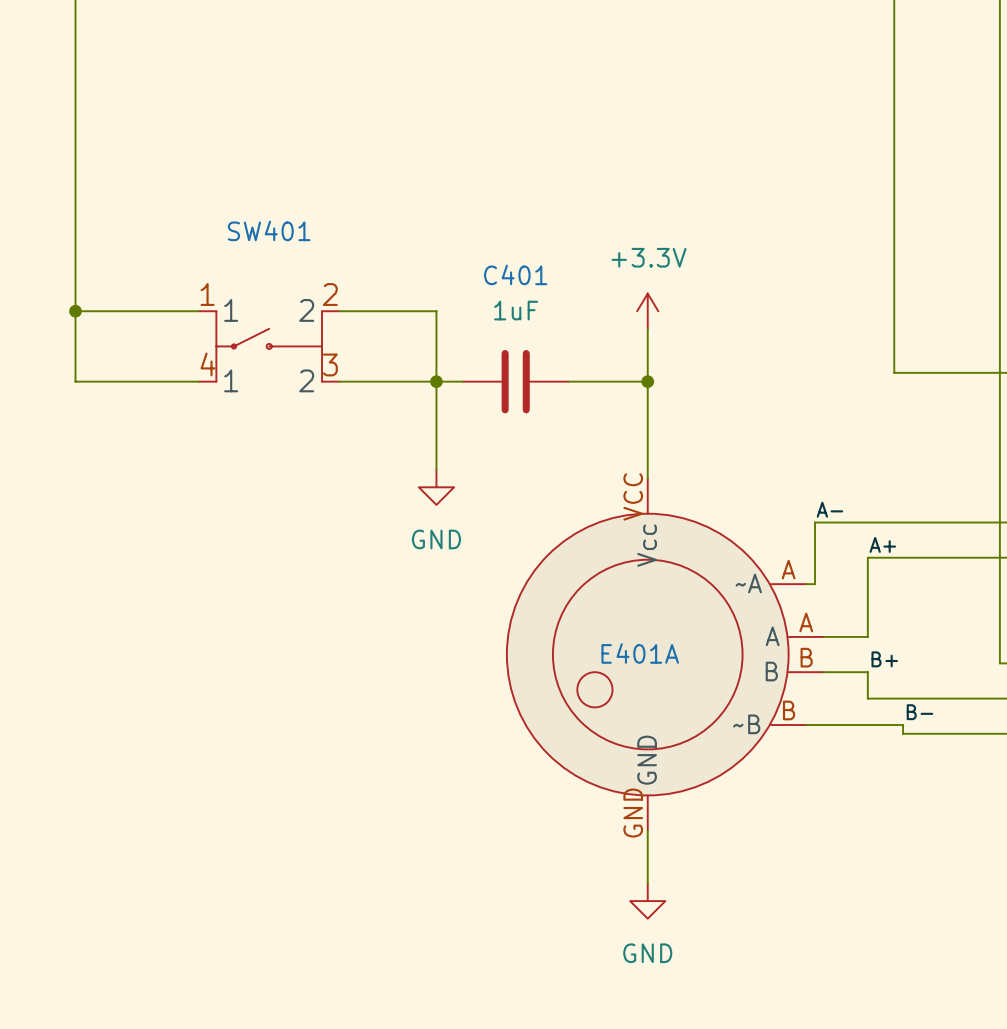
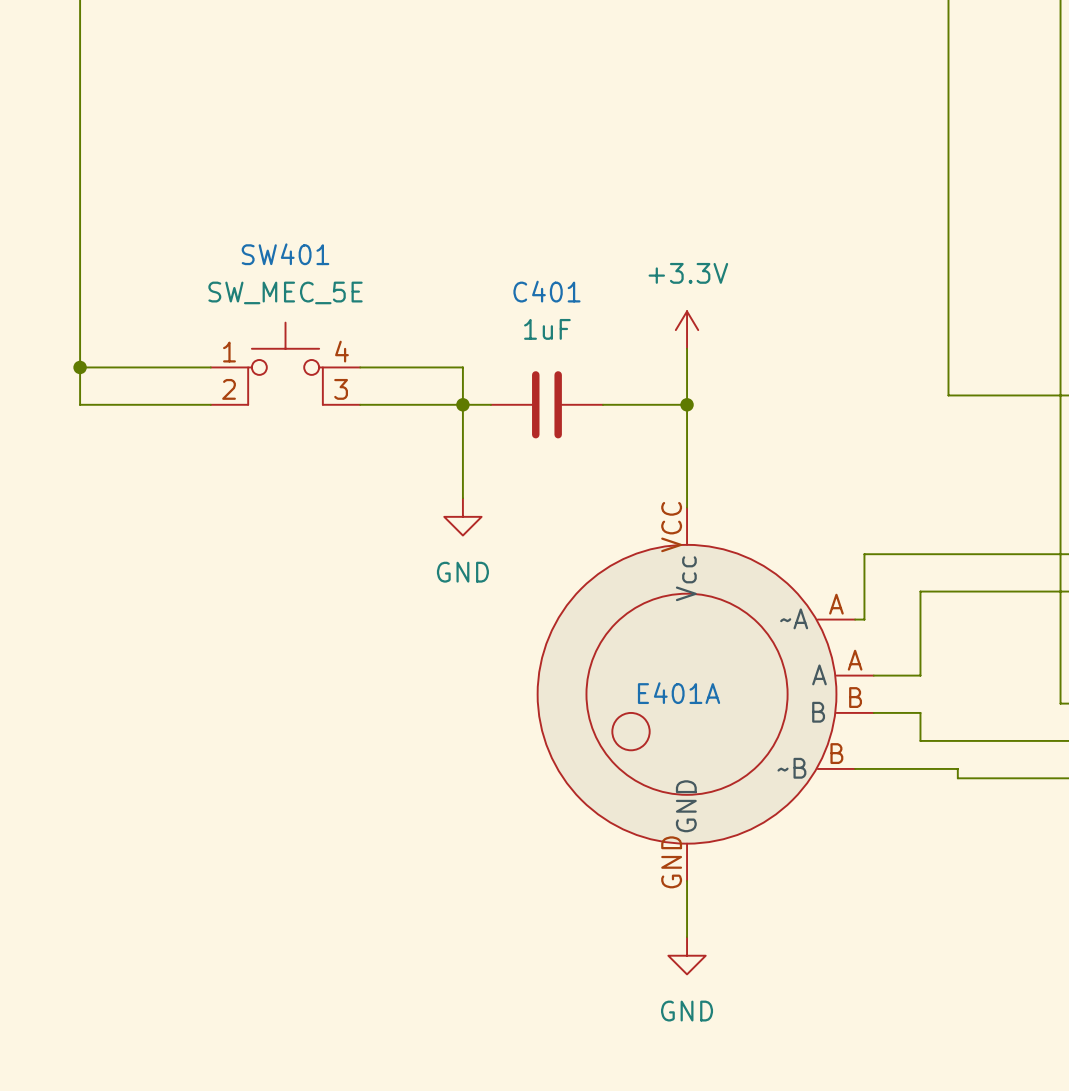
SW401 value: none -> SW_MEC_5E (285, 292)
wire: (75, 311) (198, 311) -> (80, 367) (210, 367)
junction position: (75, 311) -> (80, 367)
SW401 symbol: [198, 311, 340, 382] -> [210, 322, 361, 405]
wire: (339, 311) (436, 311) (436, 346) -> (360, 367) (462, 367)
label: A- (829, 509) -> none
label: A+ (882, 544) -> none
label: B+ (884, 659) -> none
label: B- (919, 712) -> none

